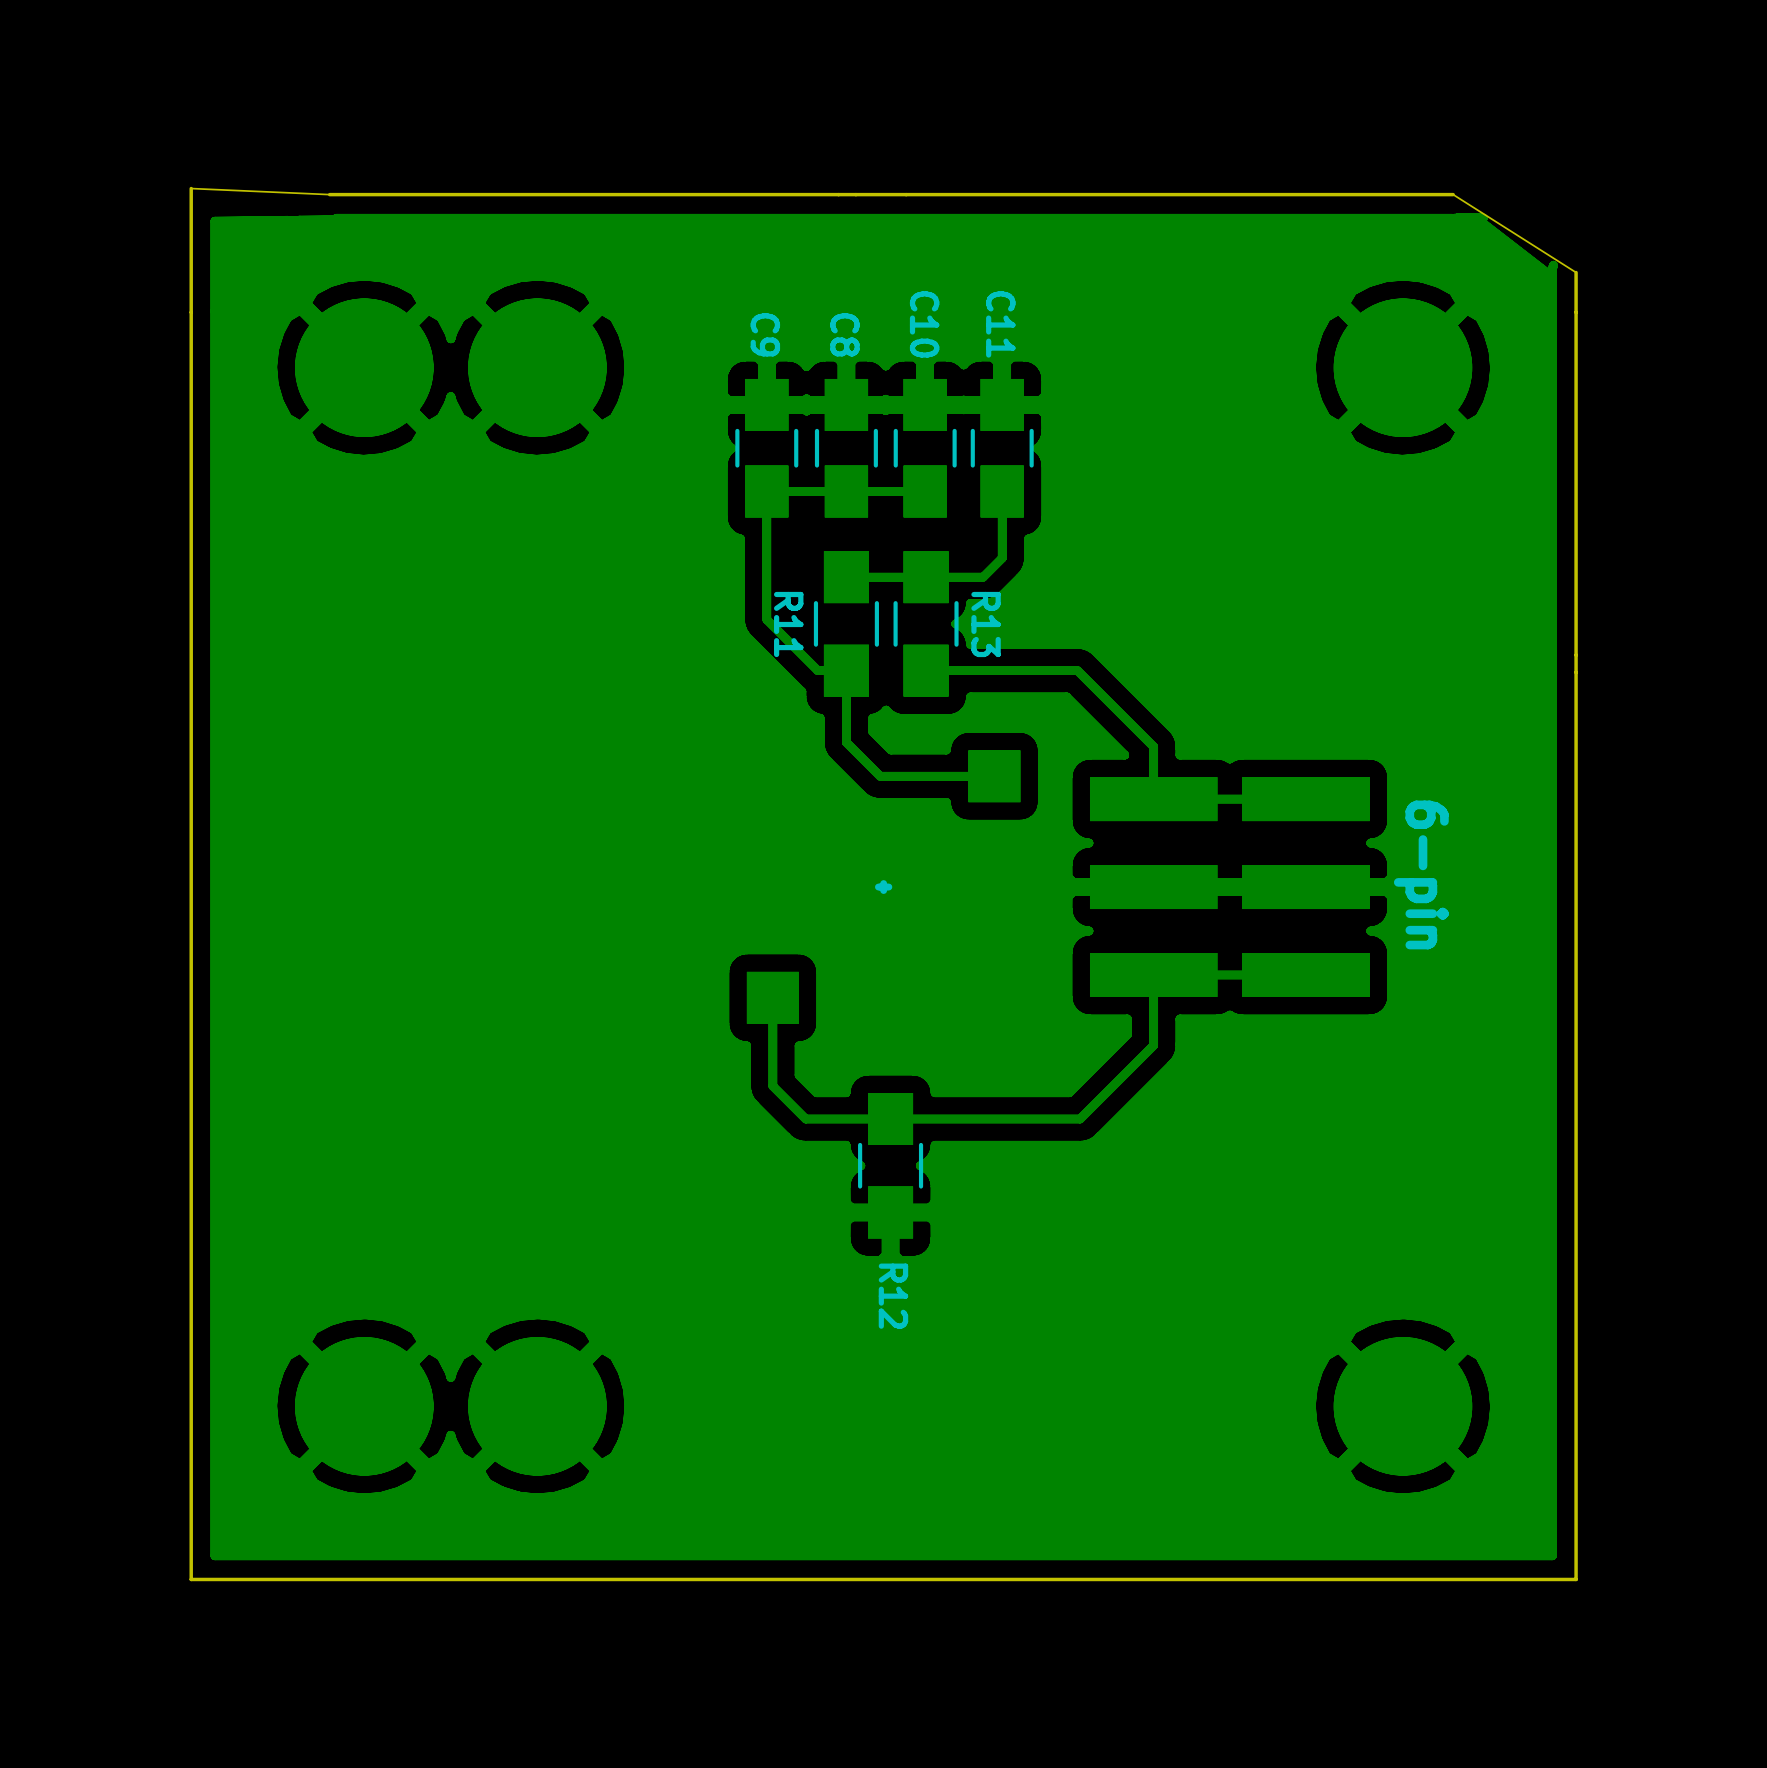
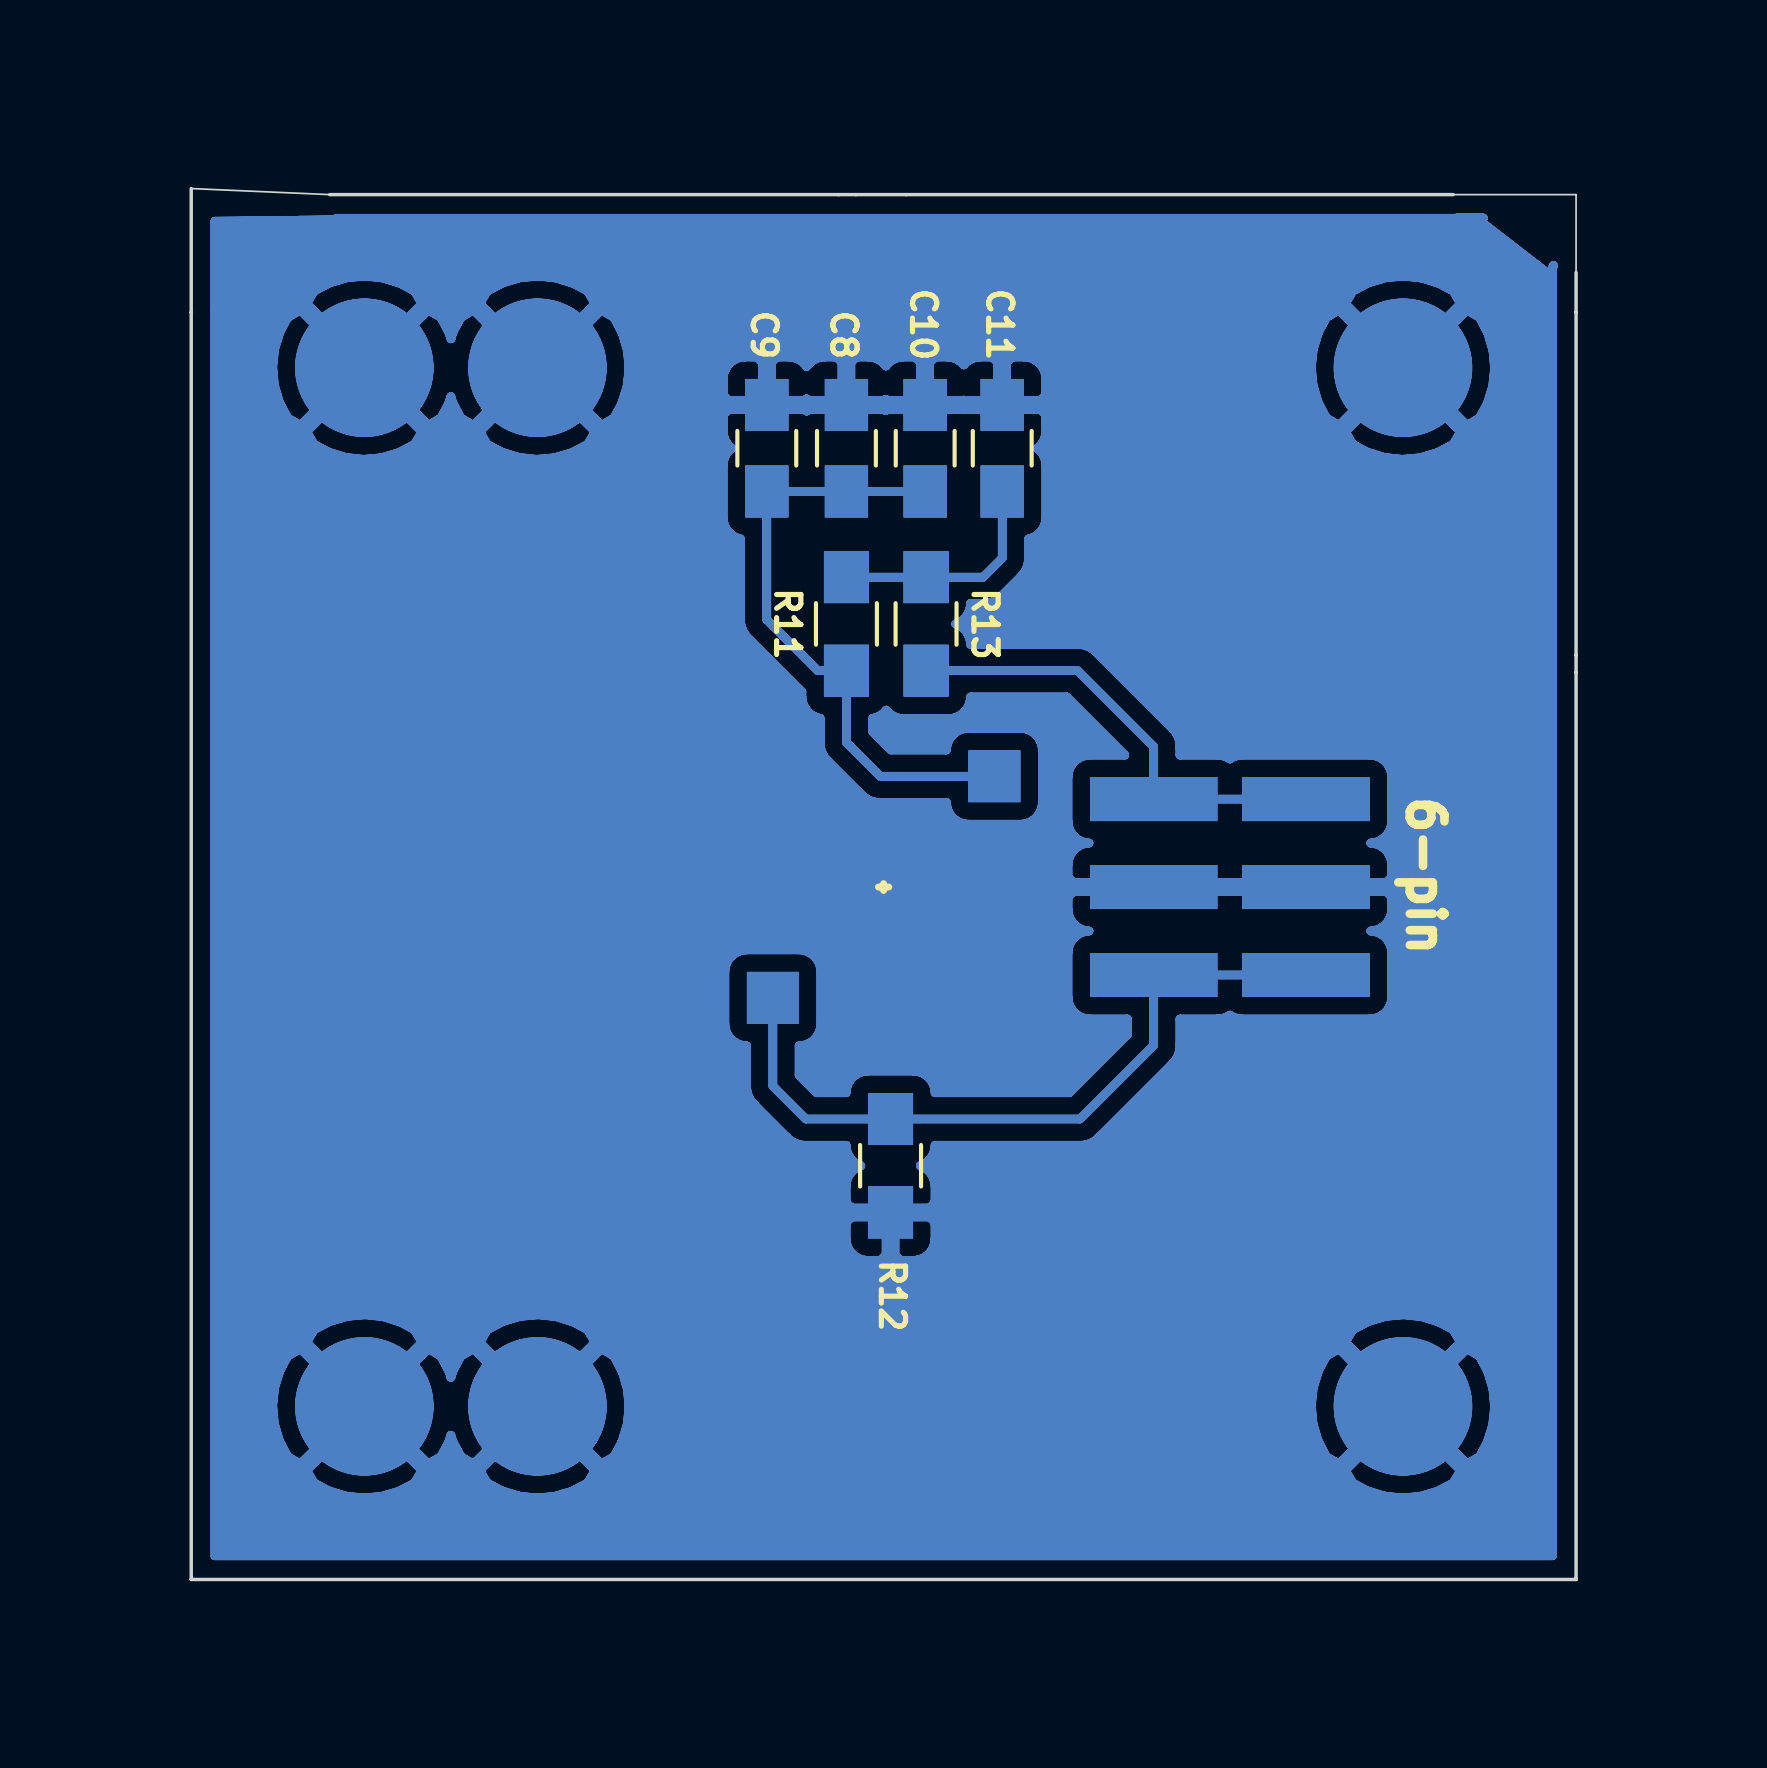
board edge: (1453, 194) (1576, 272) -> (1453, 194) (1576, 194) (1576, 272)

